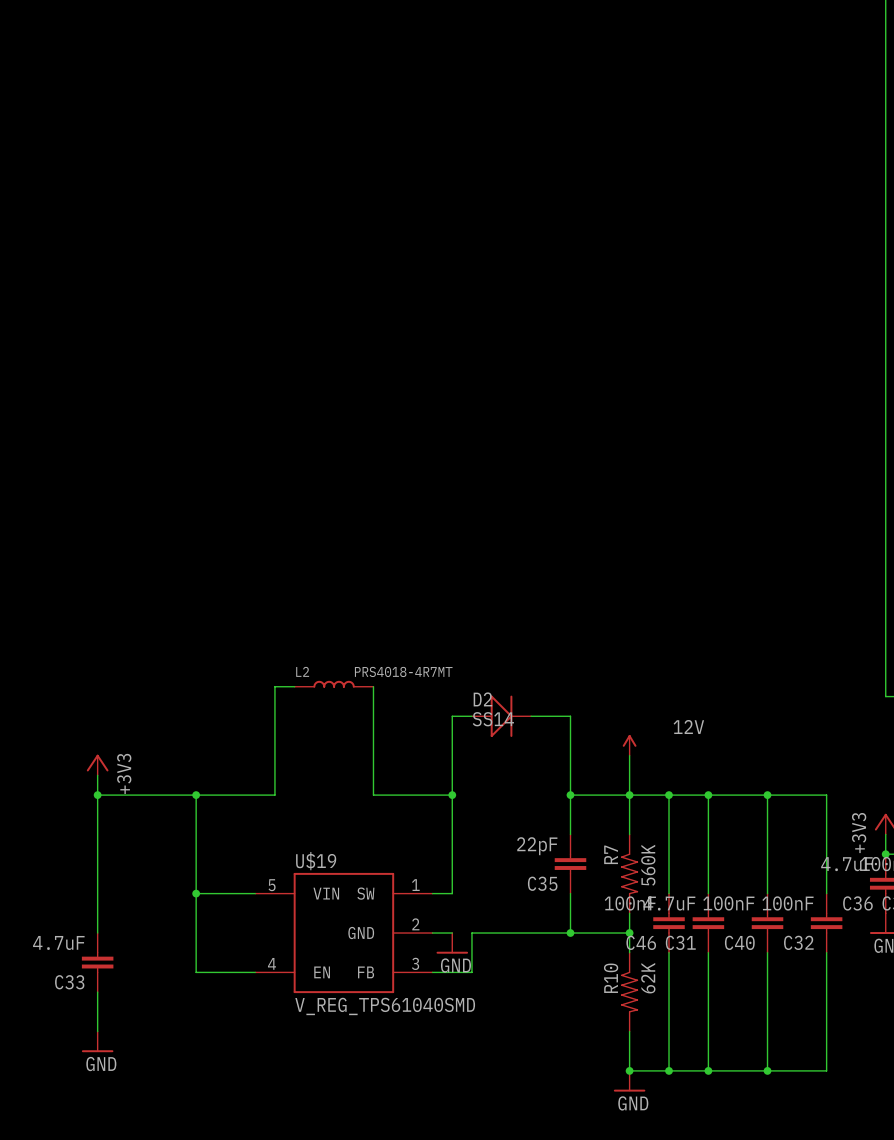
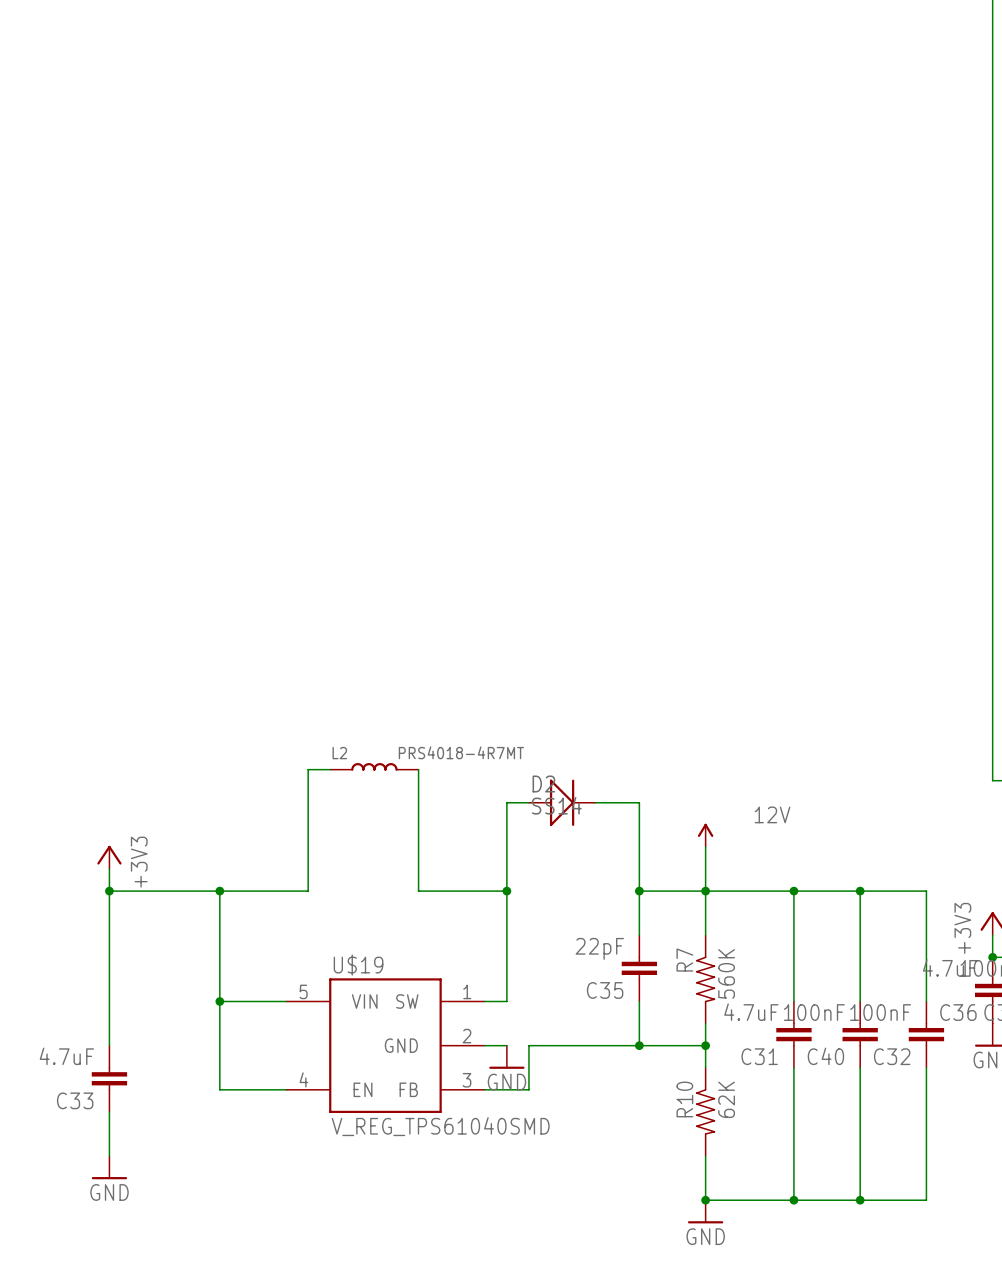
wire: (669, 795) (669, 893) -> none
junction: (669, 795) -> none
C46: 100nF (669, 923) -> none
wire: (669, 952) (669, 1070) -> none
junction: (669, 1070) -> none

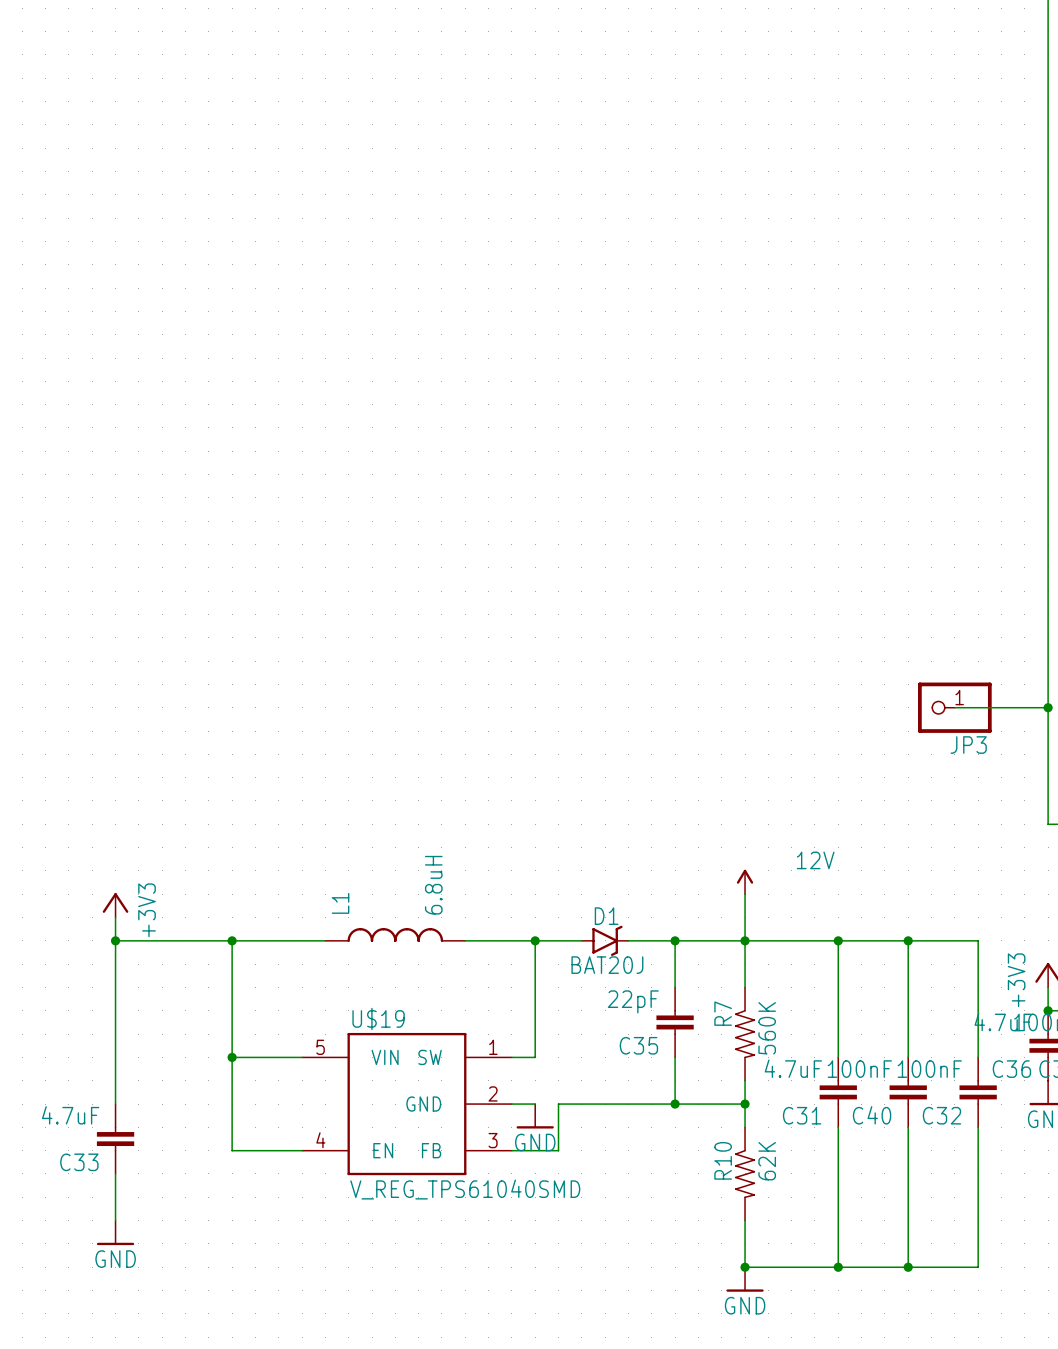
wire: none -> (954, 707) (1048, 707)
JP3: none -> (954, 707)
junction: none -> (1048, 707)
L2: PRS4018-4R7MT (374, 766) -> none
wire: (330, 769) (308, 769) (308, 891) -> none
wire: (418, 769) (418, 891) (440, 891) -> none
wire: (528, 802) (506, 802) (506, 891) -> (581, 940) (535, 940)
D2: SS14 (562, 802) -> none
wire: (595, 802) (639, 802) (639, 891) -> (628, 940) (675, 940)
L1: none -> 6.8uH (395, 935)
D1: none -> BAT20J (605, 940)

